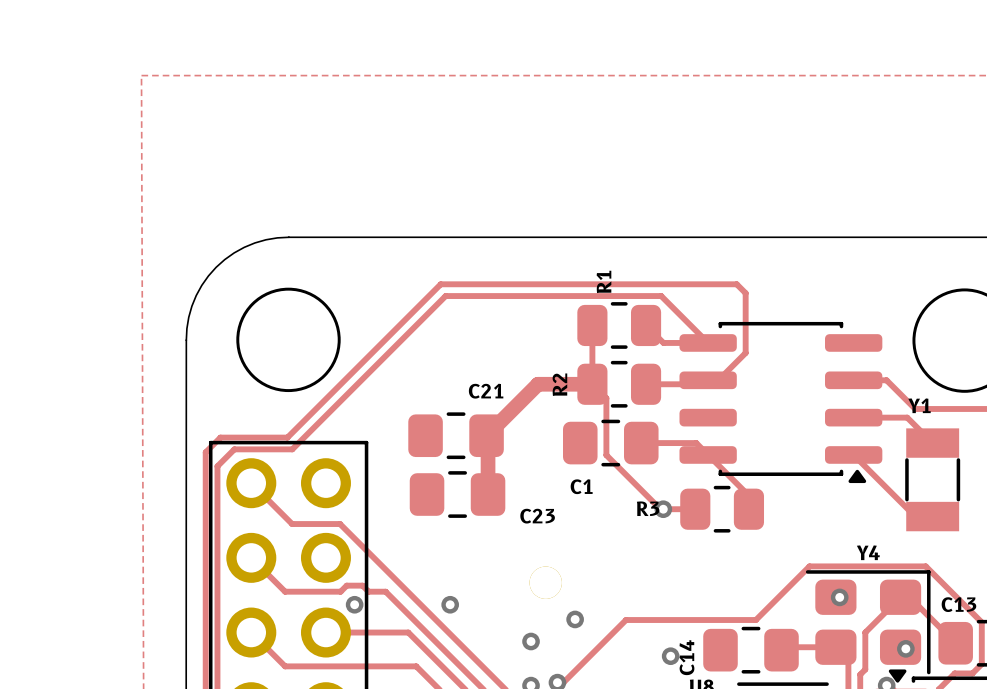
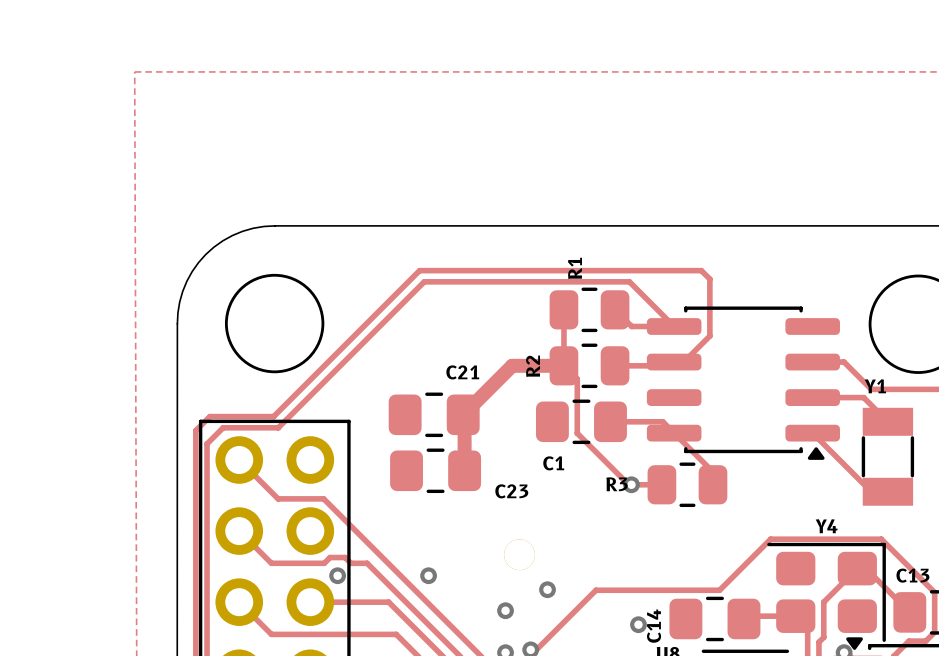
via: (839, 597) -> none
via: (905, 648) -> none

